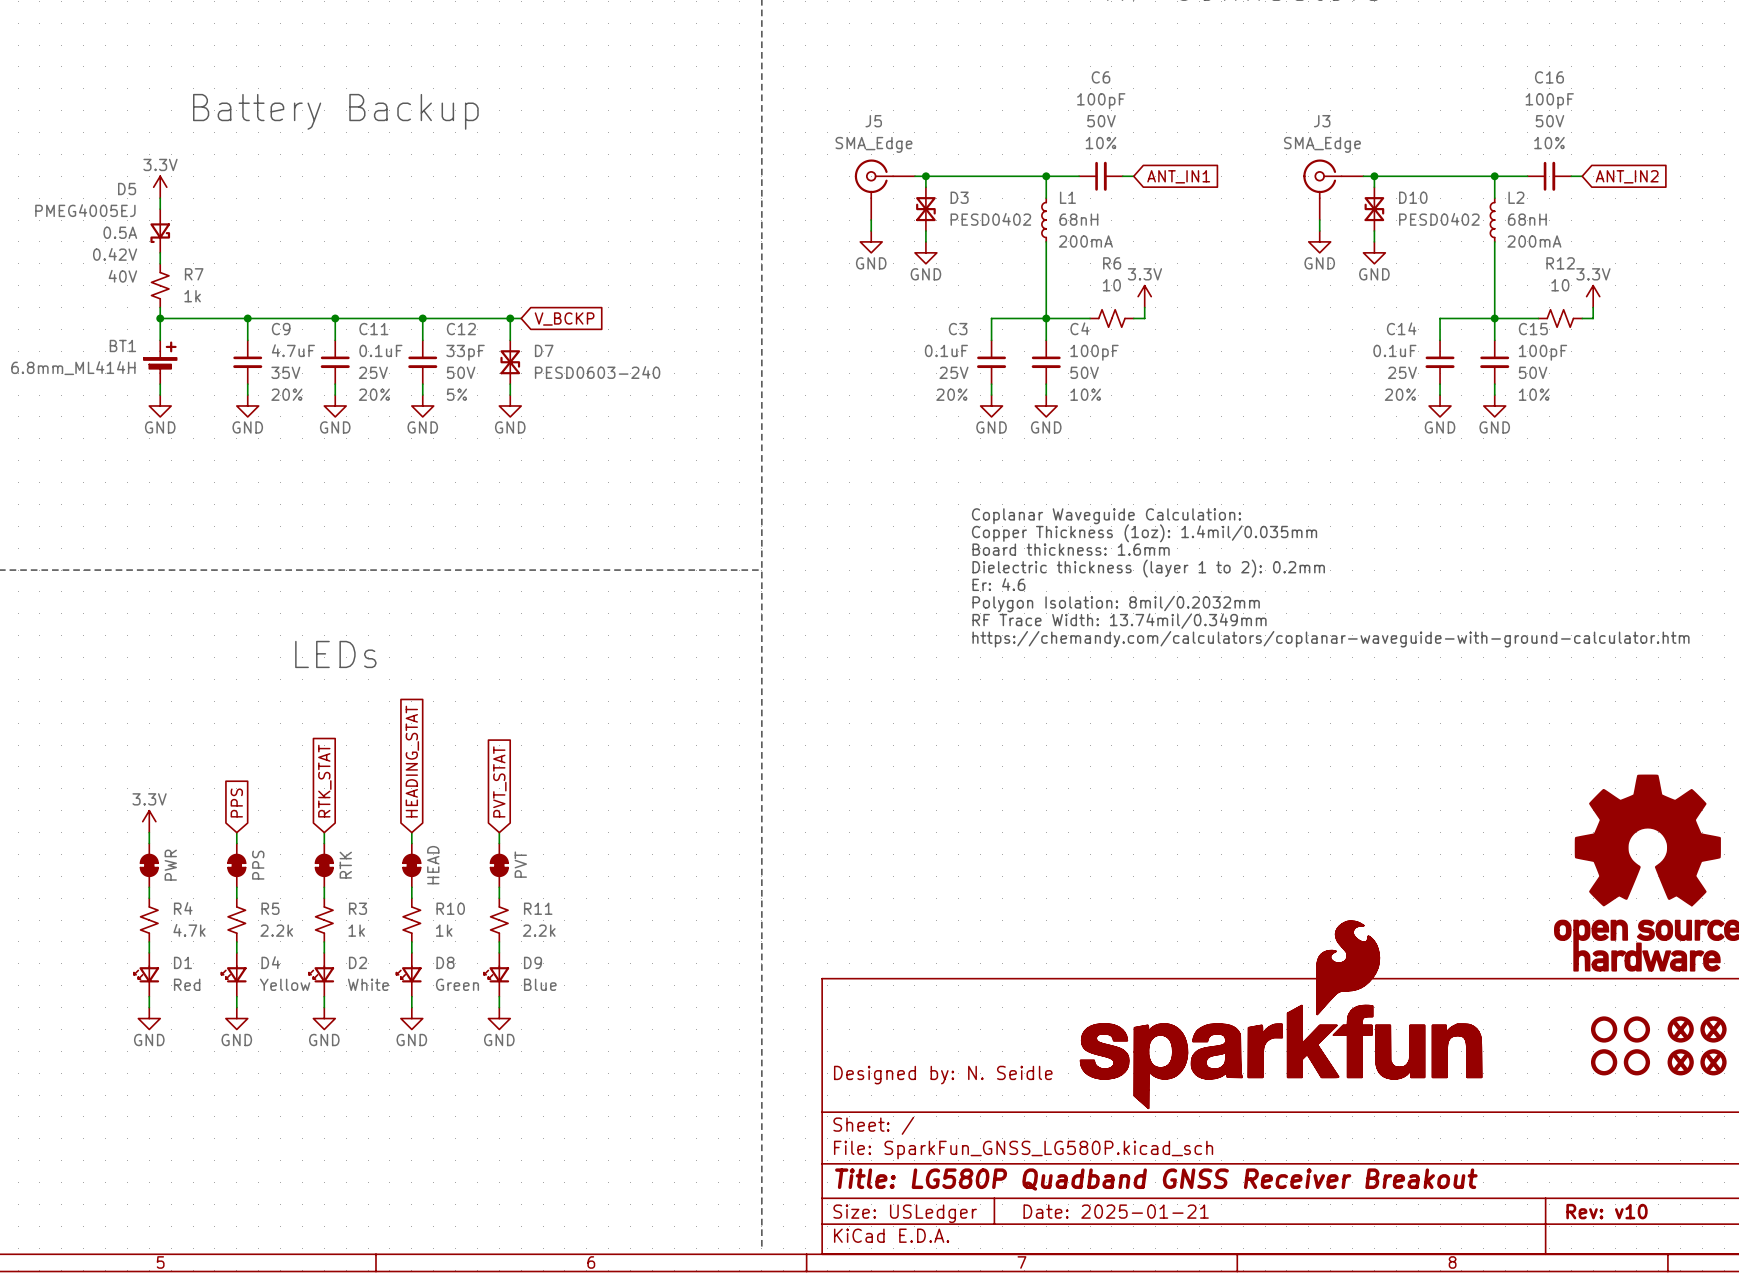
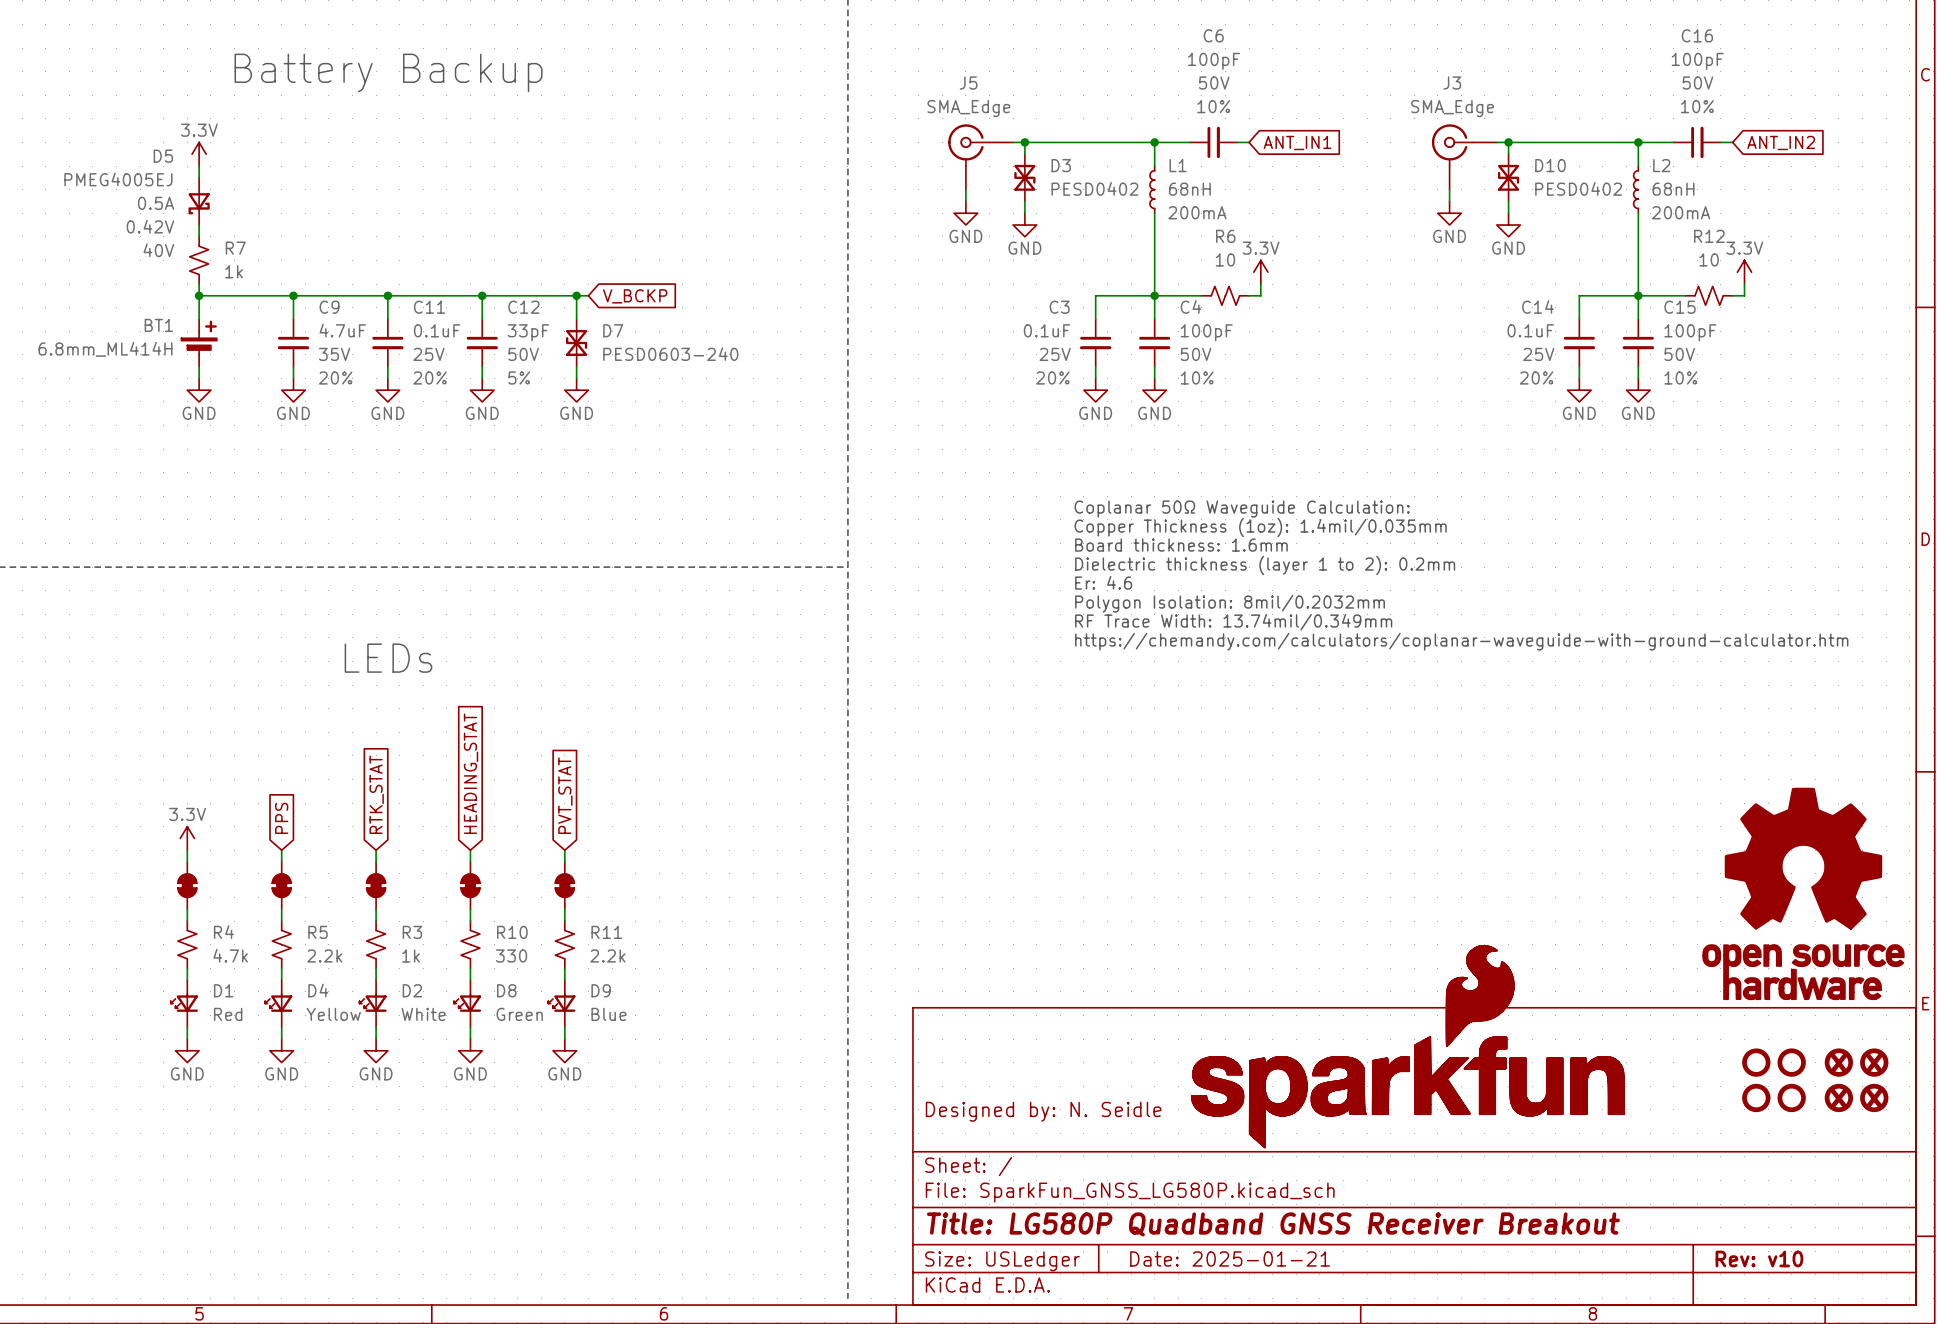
text: Coplanar Waveguide Calculation: (1106, 516) -> Coplanar 50Ω Waveguide Calculation: (1242, 509)
part value: PVT (520, 864) -> none
part value: PWR (170, 865) -> none
part value: PPS (258, 865) -> none
part value: RTK (345, 865) -> none
part value: HEAD (433, 865) -> none
R10 value: 1k (444, 930) -> 330 (511, 955)

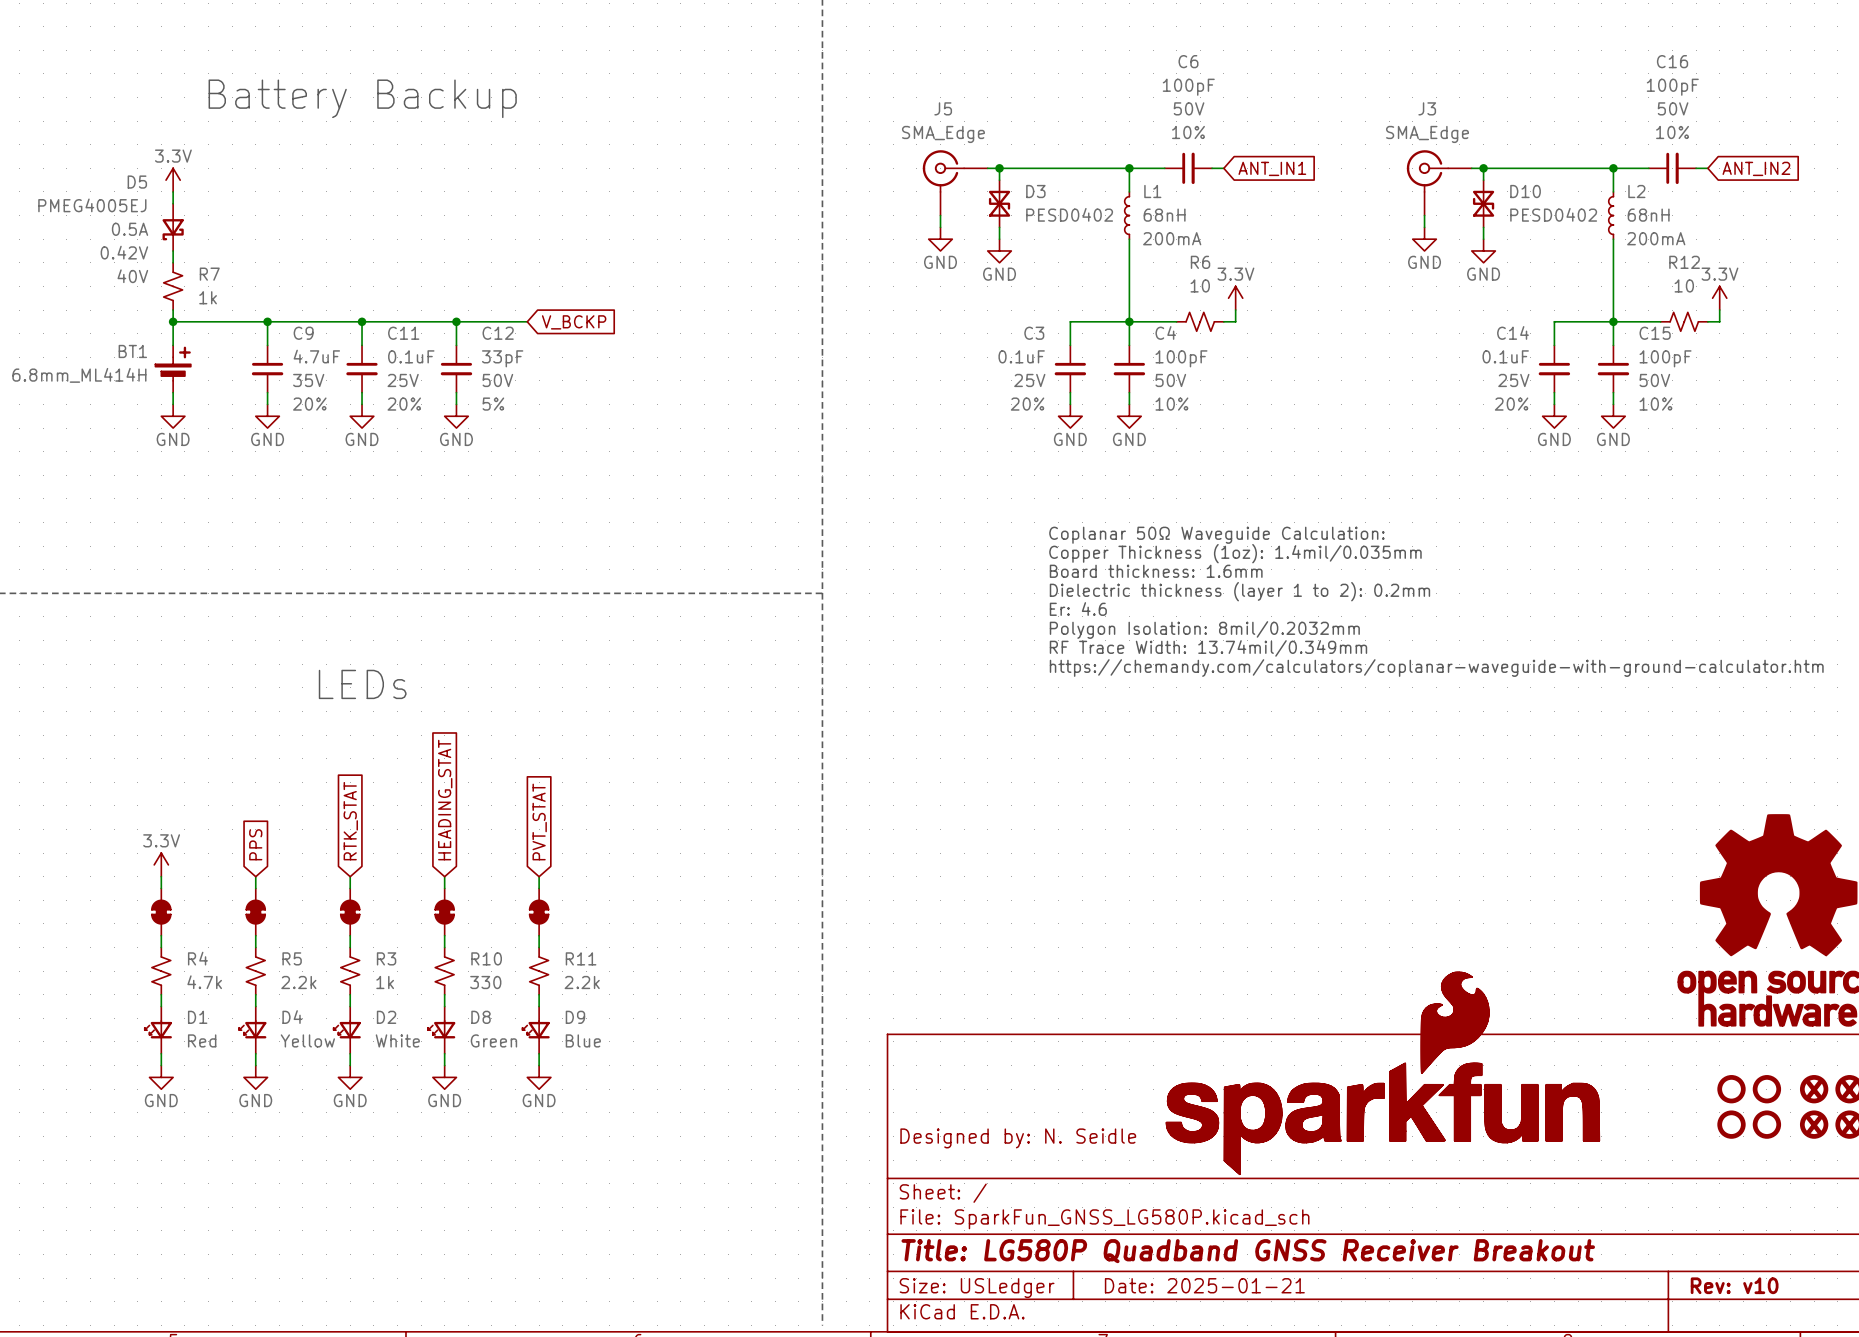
wire: (553, 295) (588, 295) -> none
wire: (576, 295) (576, 319) -> none
junction: (576, 295) -> none
global label position: V_BCKP (635, 296) -> V_BCKP (574, 322)
D7: PESD0603-240 (576, 342) -> none
wire: (576, 366) (576, 378) -> none
power symbol: GND (576, 390) -> none

